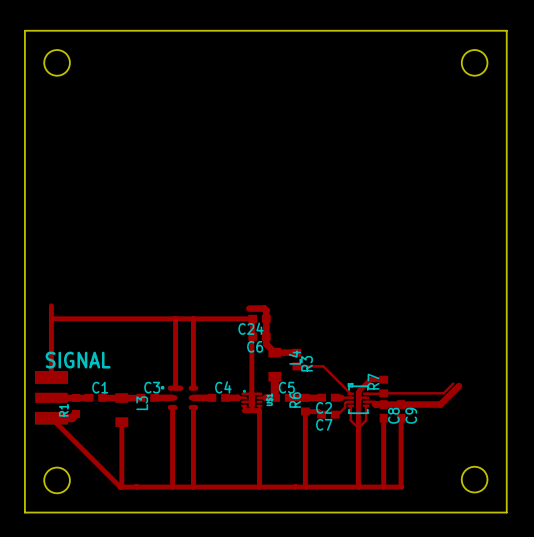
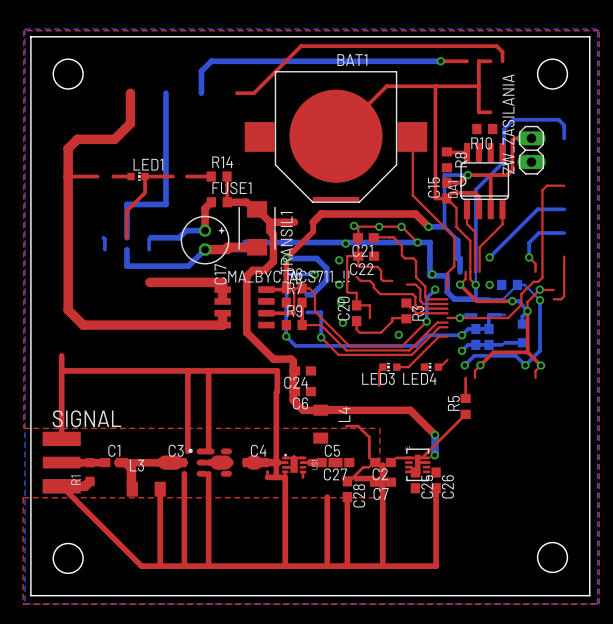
bottom zone outline: none -> (25, 29) (25, 603) (597, 603) (597, 29) (25, 29)
top zone outline: none -> (23, 30) (599, 30) (599, 604) (23, 604) (23, 497) (379, 497) (379, 428) (23, 428) (23, 30)
top track: none -> (440, 61) (467, 61)
bottom track: none -> (440, 61) (211, 61) (201, 71) (201, 93)
via: none -> (440, 61)
top track: none -> (490, 61) (478, 61) (478, 112) (490, 112)
top track: none -> (502, 61) (502, 52) (496, 46) (301, 46) (253, 93) (236, 93)
top track: none -> (435, 86) (435, 198) (446, 198)
top track: none -> (478, 86) (386, 86) (336, 136)
top track: none -> (130, 93) (130, 123) (114, 139) (77, 139) (68, 148) (68, 309) (83, 325) (222, 325) (222, 313)
bottom track: none -> (165, 93) (165, 204) (126, 204) (126, 237)
R10: none -> (484, 129)
BAT1: none -> (336, 136)
top track: none -> (412, 136) (412, 195) (454, 236) (454, 266) (447, 273) (447, 289)
top track: none -> (531, 138) (514, 138) (512, 140) (512, 170) (507, 175) (467, 175) (460, 182) (446, 182)
bottom track: none -> (564, 138) (564, 125) (558, 119) (513, 119) (504, 129) (504, 161) (475, 189) (475, 284)
ZW_ZASILANIA: none -> (531, 150)
top track: none -> (446, 151) (467, 152)
R8: none -> (446, 159)
bottom track: none -> (467, 175) (444, 175) (444, 226)
via: none -> (467, 175)
top track: none -> (490, 175) (490, 209)
top track: none -> (97, 176) (68, 176) (68, 178)
top track: none -> (113, 176) (131, 176)
LED1: none -> (138, 176)
top track: none -> (172, 176) (145, 176) (145, 192) (126, 210) (126, 237)
top track: none -> (186, 176) (211, 176)
R14: none -> (219, 176)
top track: none -> (227, 176) (227, 202) (246, 202) (257, 209) (269, 222)
DA1: none -> (484, 181)
top track: none -> (564, 185) (547, 185) (542, 190) (542, 277) (538, 281) (533, 281) (521, 294) (521, 304) (508, 318) (459, 318)
C15: none -> (446, 190)
top track: none -> (446, 198) (456, 208) (456, 227) (470, 240) (470, 279) (475, 284)
top track: none -> (446, 198) (452, 192) (475, 192) (478, 196) (478, 209)
top track: none -> (211, 202) (205, 208) (205, 230)
FUSE1: none -> (219, 202)
top track: none -> (467, 209) (467, 224) (474, 232) (474, 271)
top track: none -> (502, 209) (502, 224) (479, 247) (479, 271)
bottom track: none -> (564, 209) (537, 209) (489, 257)
top track: none -> (269, 222) (294, 222)
top track: none -> (269, 222) (269, 231) (273, 234) (273, 261) (264, 270) (252, 270) (246, 276) (246, 332) (273, 359) (291, 359) (293, 361) (293, 400) (303, 410) (410, 410) (435, 434)
via: none -> (354, 225)
via: none -> (379, 226)
via: none -> (401, 226)
top track: none -> (428, 226) (415, 214) (321, 214) (313, 222) (313, 231) (286, 258) (286, 289) (266, 289)
bottom track: none -> (428, 226) (444, 226)
via: none -> (428, 226)
bottom track: none -> (444, 226) (457, 240) (459, 272)
TRANSIL1: none -> (257, 228)
bottom track: none -> (205, 230) (186, 230) (179, 237) (150, 237) (149, 249)
bottom track: none -> (564, 233) (538, 233) (529, 242) (529, 257)
bottom track: none -> (103, 237) (104, 249)
C21: none -> (365, 237)
top track: none -> (373, 237) (393, 237) (401, 245) (401, 255) (404, 258) (413, 258) (416, 260) (416, 277) (425, 286) (425, 296) (427, 299) (447, 299)
C17: none -> (205, 240)
top track: none -> (417, 242) (401, 226) (358, 226) (358, 265) (377, 266) (381, 270) (381, 279) (383, 280) (392, 280)
via: none -> (417, 242)
via: none -> (345, 243)
top track: none -> (257, 247) (205, 249)
bottom track: none -> (126, 249) (126, 266) (188, 266) (205, 249) (245, 249) (245, 242) (429, 242) (429, 275) (447, 275) (447, 292) (454, 299) (475, 299) (475, 284)
top track: none -> (358, 256) (347, 256) (347, 291) (356, 292) (356, 305) (369, 305) (369, 318)
C22: none -> (366, 256)
via: none -> (489, 257)
top track: none -> (529, 257) (535, 263) (535, 271)
via: none -> (529, 257)
top track: none -> (564, 256) (564, 296) (561, 299) (553, 299)
bottom track: none -> (286, 258) (316, 258) (326, 268) (326, 280) (312, 294) (307, 294)
via: none -> (286, 258)
via: none -> (339, 260)
top track: none -> (465, 271) (465, 279) (460, 284) (476, 301) (512, 301)
bottom track: none -> (315, 274) (286, 274) (286, 336) (295, 345) (415, 345) (426, 335) (461, 335) (468, 329) (489, 329) (488, 314) (505, 314)
via: none -> (314, 274)
via: none -> (432, 274)
top track: none -> (356, 276) (360, 280) (369, 280) (380, 294) (412, 294) (415, 296) (415, 304) (419, 308) (447, 308)
top track: none -> (149, 282) (222, 282) (222, 301)
via: none -> (339, 284)
top track: none -> (406, 284) (415, 284) (420, 289) (420, 300) (423, 303) (447, 303)
via: none -> (460, 284)
via: none -> (475, 284)
via: none -> (489, 284)
part: none -> (509, 284)
bottom track: none -> (435, 289) (426, 298) (426, 321)
via: none -> (435, 289)
via: none -> (539, 289)
top track: none -> (553, 289) (539, 289) (527, 302) (527, 352)
bottom track: none -> (475, 299) (503, 299) (517, 284) (524, 284) (540, 300) (540, 350) (525, 365) (515, 355) (474, 355) (464, 365)
via: none -> (540, 300)
bottom track: none -> (512, 301) (518, 301) (527, 311) (522, 316) (522, 324)
via: none -> (512, 301)
top track: none -> (302, 302) (302, 325) (321, 325) (346, 350) (409, 350) (437, 322) (447, 322)
via: none -> (341, 302)
top track: none -> (406, 302) (416, 313) (447, 313)
MA_BYC_ACS711_!!: none -> (244, 307)
via: none -> (527, 311)
bottom track: none -> (307, 312) (321, 312) (321, 337)
top track: none -> (266, 313) (294, 313) (294, 288) (309, 288) (315, 293) (315, 311) (349, 346) (402, 346) (426, 321)
C20: none -> (356, 313)
bottom track: none -> (475, 314) (466, 314) (459, 318)
top track: none -> (406, 318) (392, 318) (392, 321) (381, 332) (359, 332) (356, 329) (356, 321)
top track: none -> (447, 317) (459, 317)
via: none -> (459, 318)
via: none -> (426, 321)
via: none -> (342, 322)
R9: none -> (294, 325)
top track: none -> (447, 327) (439, 327) (411, 354) (338, 354) (321, 337)
part: none -> (522, 333)
via: none -> (398, 334)
via: none -> (461, 335)
via: none -> (286, 336)
via: none -> (321, 337)
top track: none -> (447, 336) (439, 336) (408, 367) (396, 367)
bottom track: none -> (522, 342) (467, 344) (461, 350)
via: none -> (461, 350)
top track: none -> (527, 352) (493, 352) (474, 370) (474, 378)
top track: none -> (527, 352) (540, 365) (535, 371) (535, 378)
top track: (249, 308) (264, 308) (266, 310) (266, 344) (274, 352) -> none
top track: none -> (447, 359) (438, 367)
via: none -> (464, 365)
via: none -> (480, 365)
via: none -> (525, 365)
via: none -> (540, 365)
top track: none -> (382, 367) (379, 370) (379, 385)
LED3: none -> (389, 367)
LED4: none -> (431, 367)
top track: (175, 318) (175, 388) -> (187, 370) (187, 451)
top track: (193, 318) (193, 388) -> (208, 370) (208, 451)
top track: (237, 318) (252, 318) (251, 410) -> (277, 370) (276, 477)
top track: none -> (465, 378) (465, 398)
R5: none -> (465, 406)
top track: none -> (465, 414) (421, 457) (396, 457)
R3 position: (296, 359) -> (406, 310)
top track: (307, 366) (323, 366) (350, 393) -> (358, 426) (369, 437) (369, 457)
bottom track: none -> (435, 434) (434, 455)
via: none -> (435, 434)
top track: (274, 376) (274, 396) -> none
top track: (383, 379) (370, 379) (359, 391) (358, 487) -> none
top track: (453, 383) (443, 393) (366, 393) -> none
R7 rotation: 0° (383, 386) -> 90° clockwise (294, 302)
R7 position: (383, 386) -> (294, 302)
top track: (458, 386) (440, 404) (375, 404) (372, 401) (366, 401) -> none
via: none -> (434, 455)
top track: none -> (118, 462) (125, 462) (131, 468) (132, 489)
top track: none -> (160, 462) (181, 462)
top track: (157, 397) (172, 397) -> none
top track: none -> (208, 462) (226, 462)
top track: (196, 397) (210, 397) -> none
top track: none -> (247, 462) (255, 462)
C27: none -> (341, 462)
top track: (335, 397) (350, 397) -> none
top track: none -> (382, 464) (382, 566)
top track: none -> (369, 467) (363, 467) (347, 481)
top track: (350, 401) (346, 402) (345, 407) (337, 414) (335, 414) -> none
L3 name position: L3 (142, 403) -> L3 (136, 465)
R6 rotation: 0° (305, 404) -> 90° clockwise (294, 288)
R6 position: (305, 404) -> (294, 288)
top track: none -> (267, 471) (267, 477) (285, 477) (285, 566)
top track: (350, 405) (350, 420) (358, 428) (366, 420) (366, 405) -> none
top track: (172, 407) (172, 487) -> (184, 473) (184, 566)
top track: (193, 407) (193, 487) -> (208, 473) (208, 566)
L3 rotation: 0° (121, 410) -> 90° clockwise (146, 489)
top track: (244, 410) (259, 410) (259, 487) -> none
top track: (305, 411) (306, 487) -> none
C8 side: top (383, 411) -> bottom (489, 337)
C9 side: top (401, 411) -> bottom (475, 336)
C25: none -> (415, 480)
C26: none -> (436, 480)
top track: (383, 418) (383, 487) -> none
top track: (401, 418) (401, 487) (374, 487) -> (436, 488) (436, 566)
top track: none -> (160, 489) (160, 565)
C28: none -> (347, 489)
top track: (121, 422) (121, 487) -> none
top track: none -> (327, 497) (326, 566)
top track: none -> (347, 497) (347, 566)

